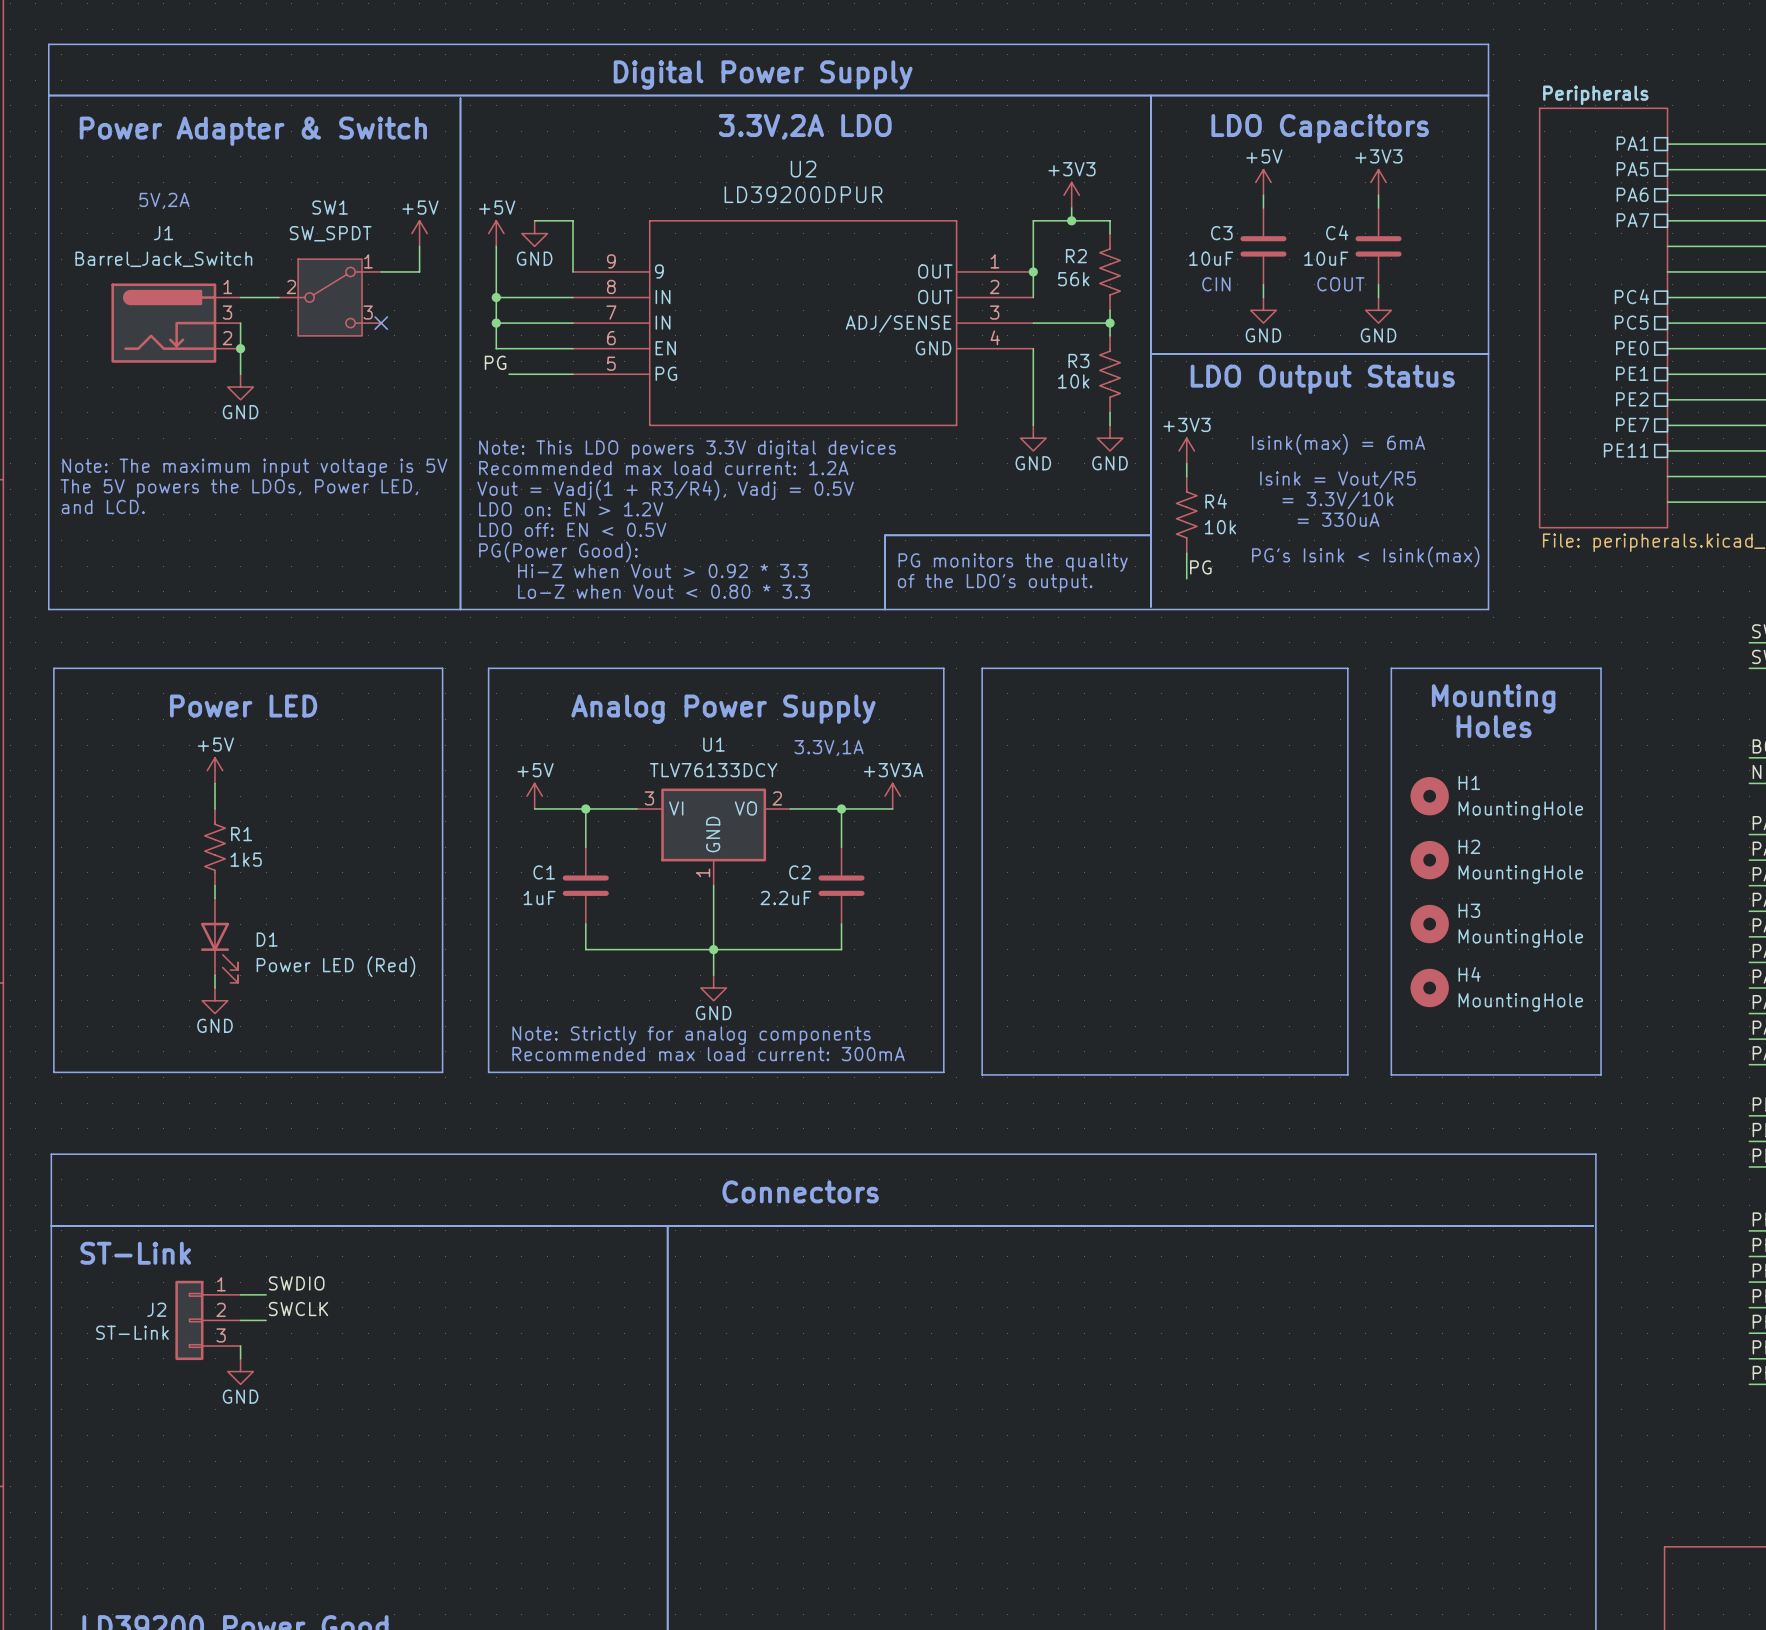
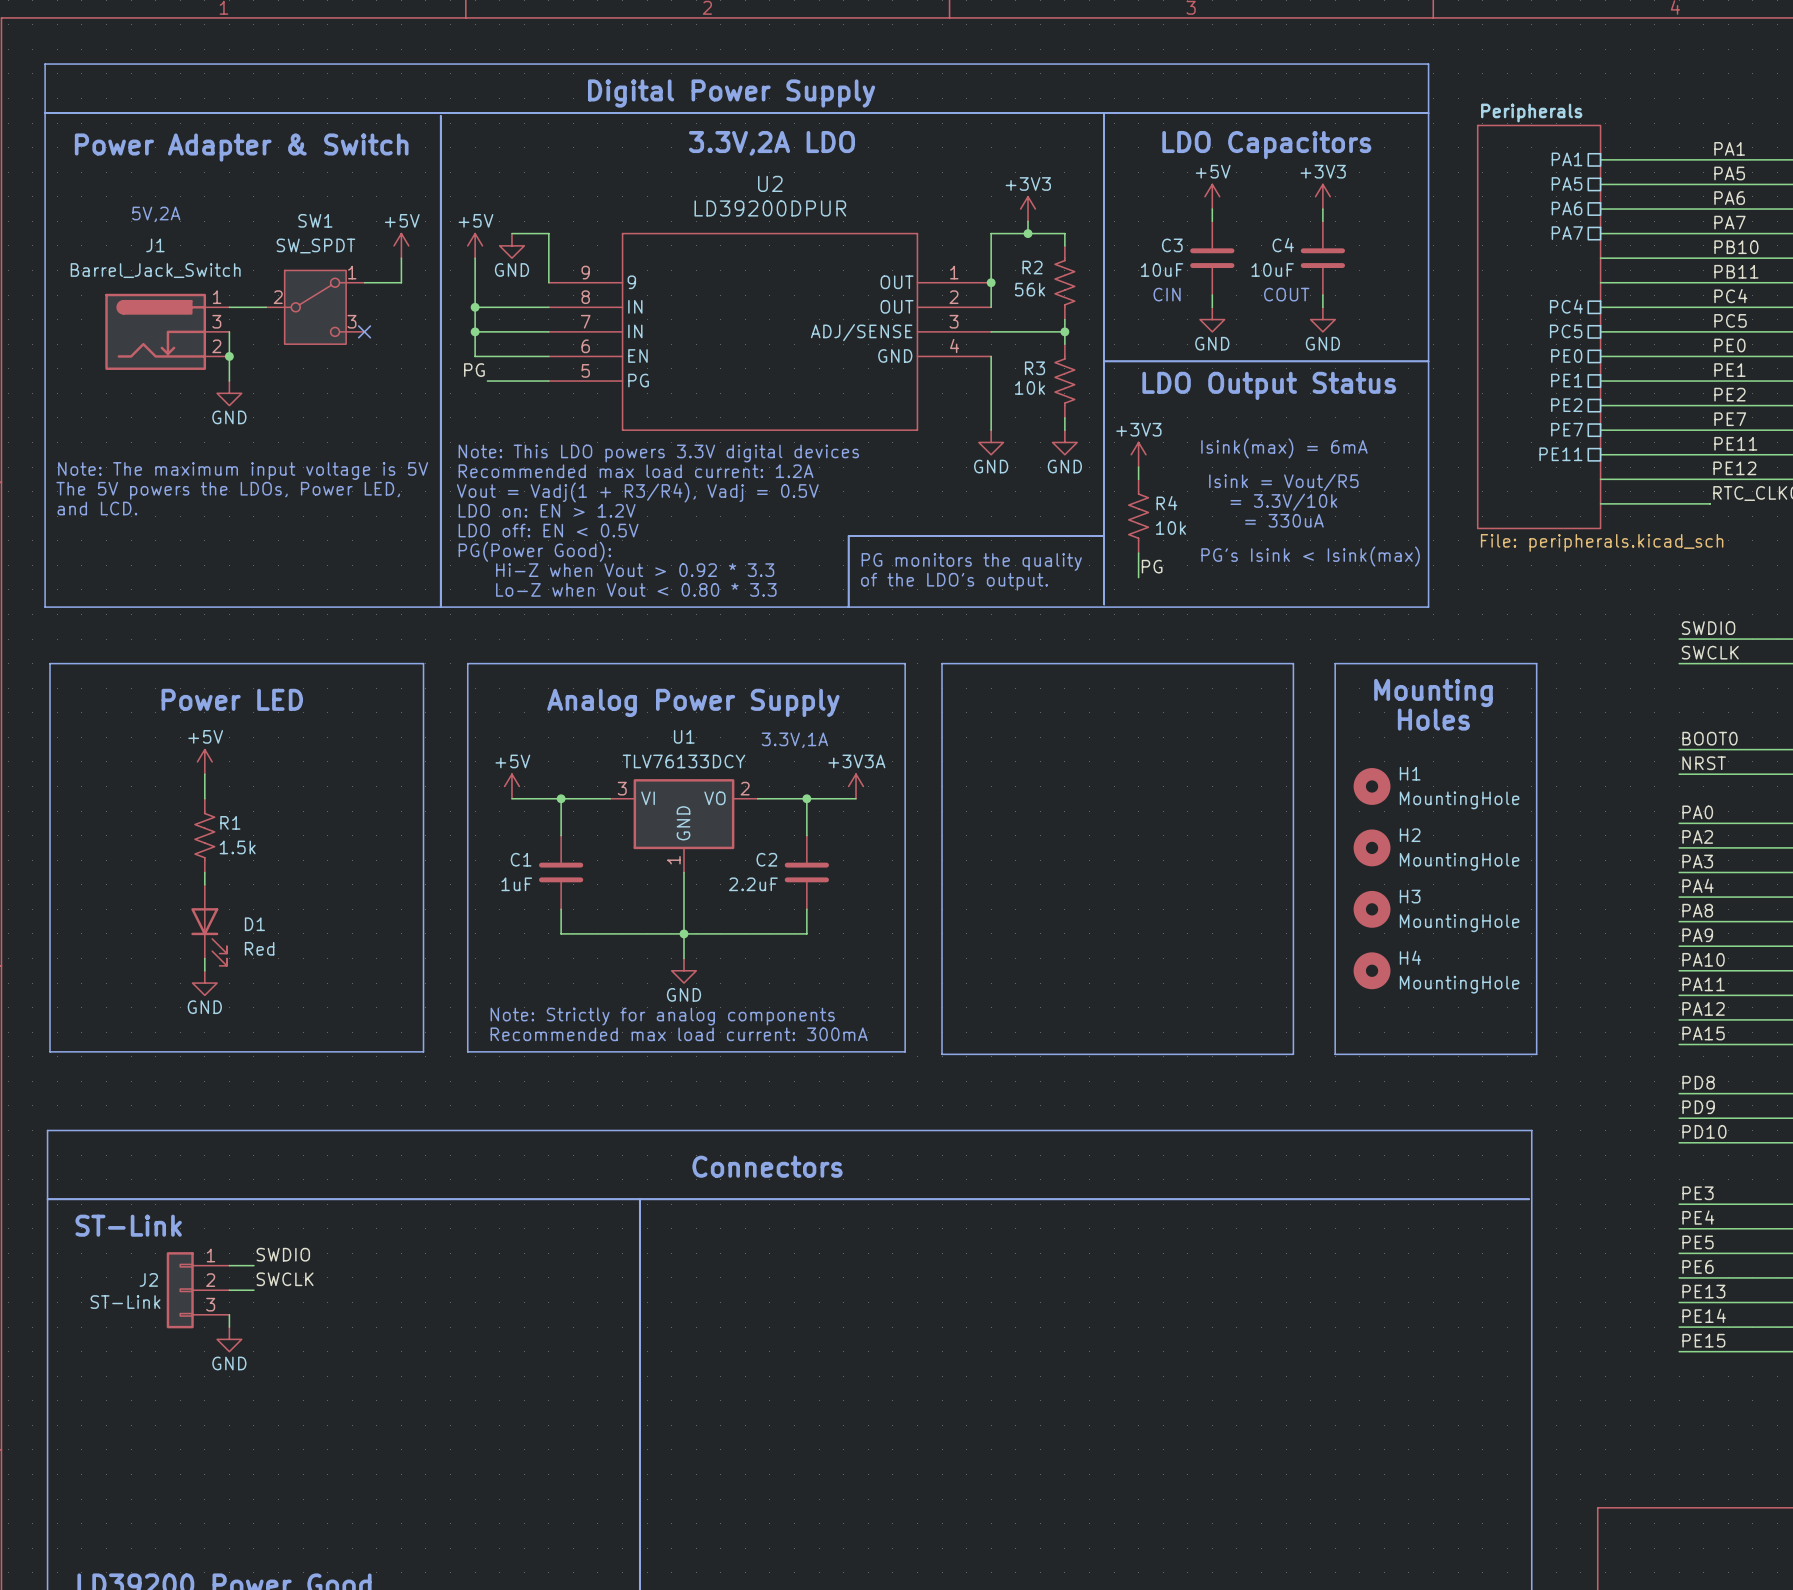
R1 value: 1k5 (246, 859) -> 1.5k (237, 847)
D1 value: Power LED (Red) (335, 966) -> Red (259, 948)

